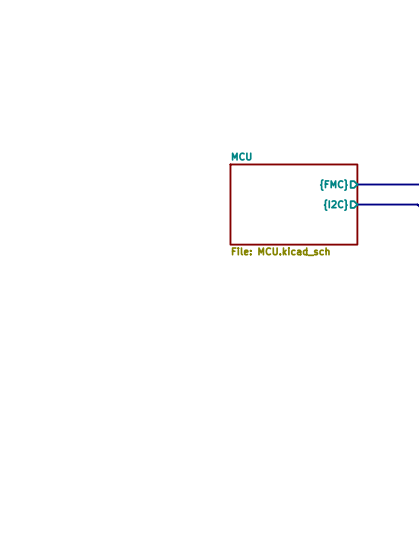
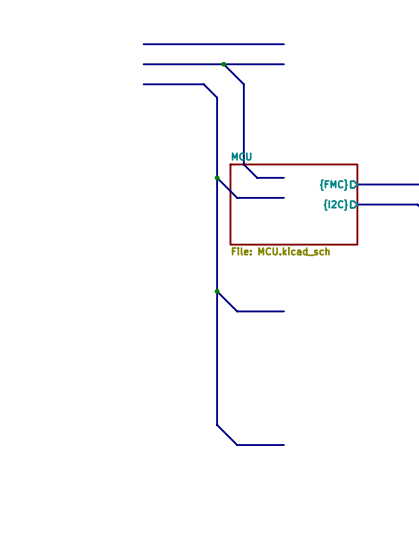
bus: none -> (143, 44) (283, 44)
bus: none -> (143, 64) (283, 64)
bus: none -> (223, 64) (243, 84) (243, 164) (257, 177) (283, 177)
junction: none -> (223, 64)
bus: none -> (143, 84) (203, 84) (217, 97) (217, 424) (237, 445) (283, 445)
bus: none -> (217, 177) (237, 197) (283, 197)
junction: none -> (217, 177)
bus: none -> (217, 291) (237, 311) (283, 311)
junction: none -> (217, 291)

